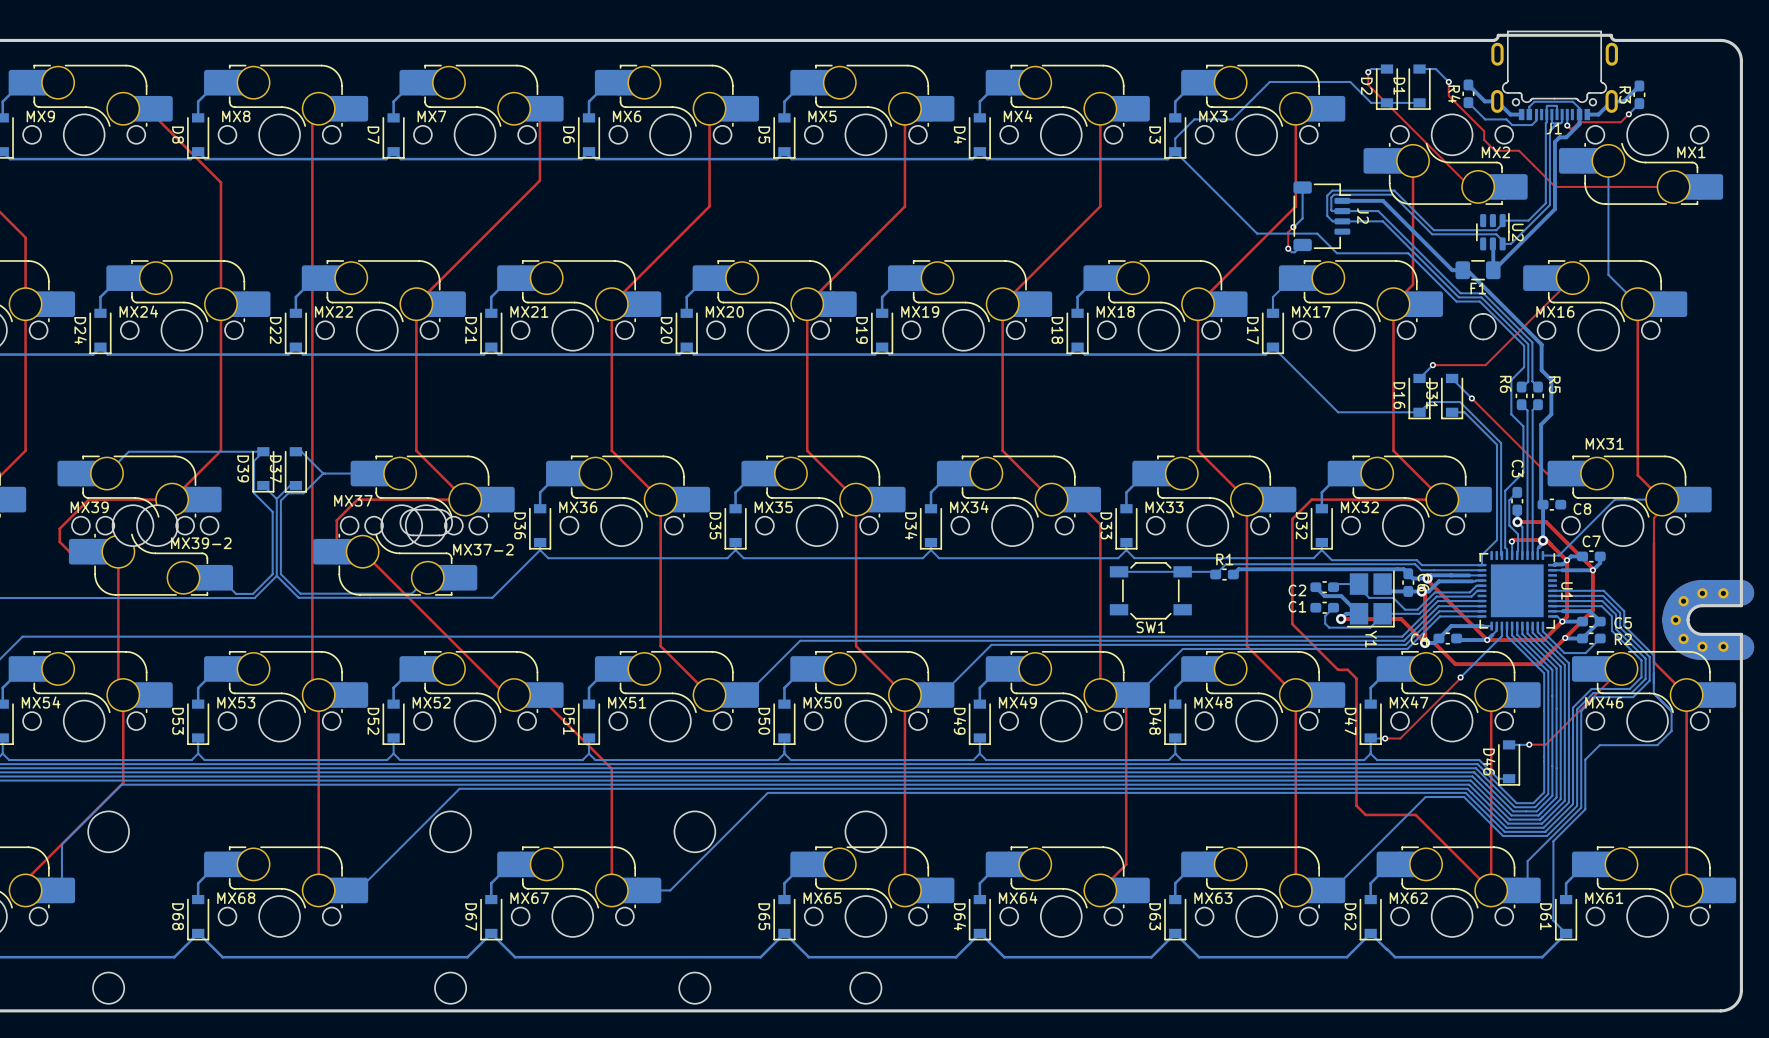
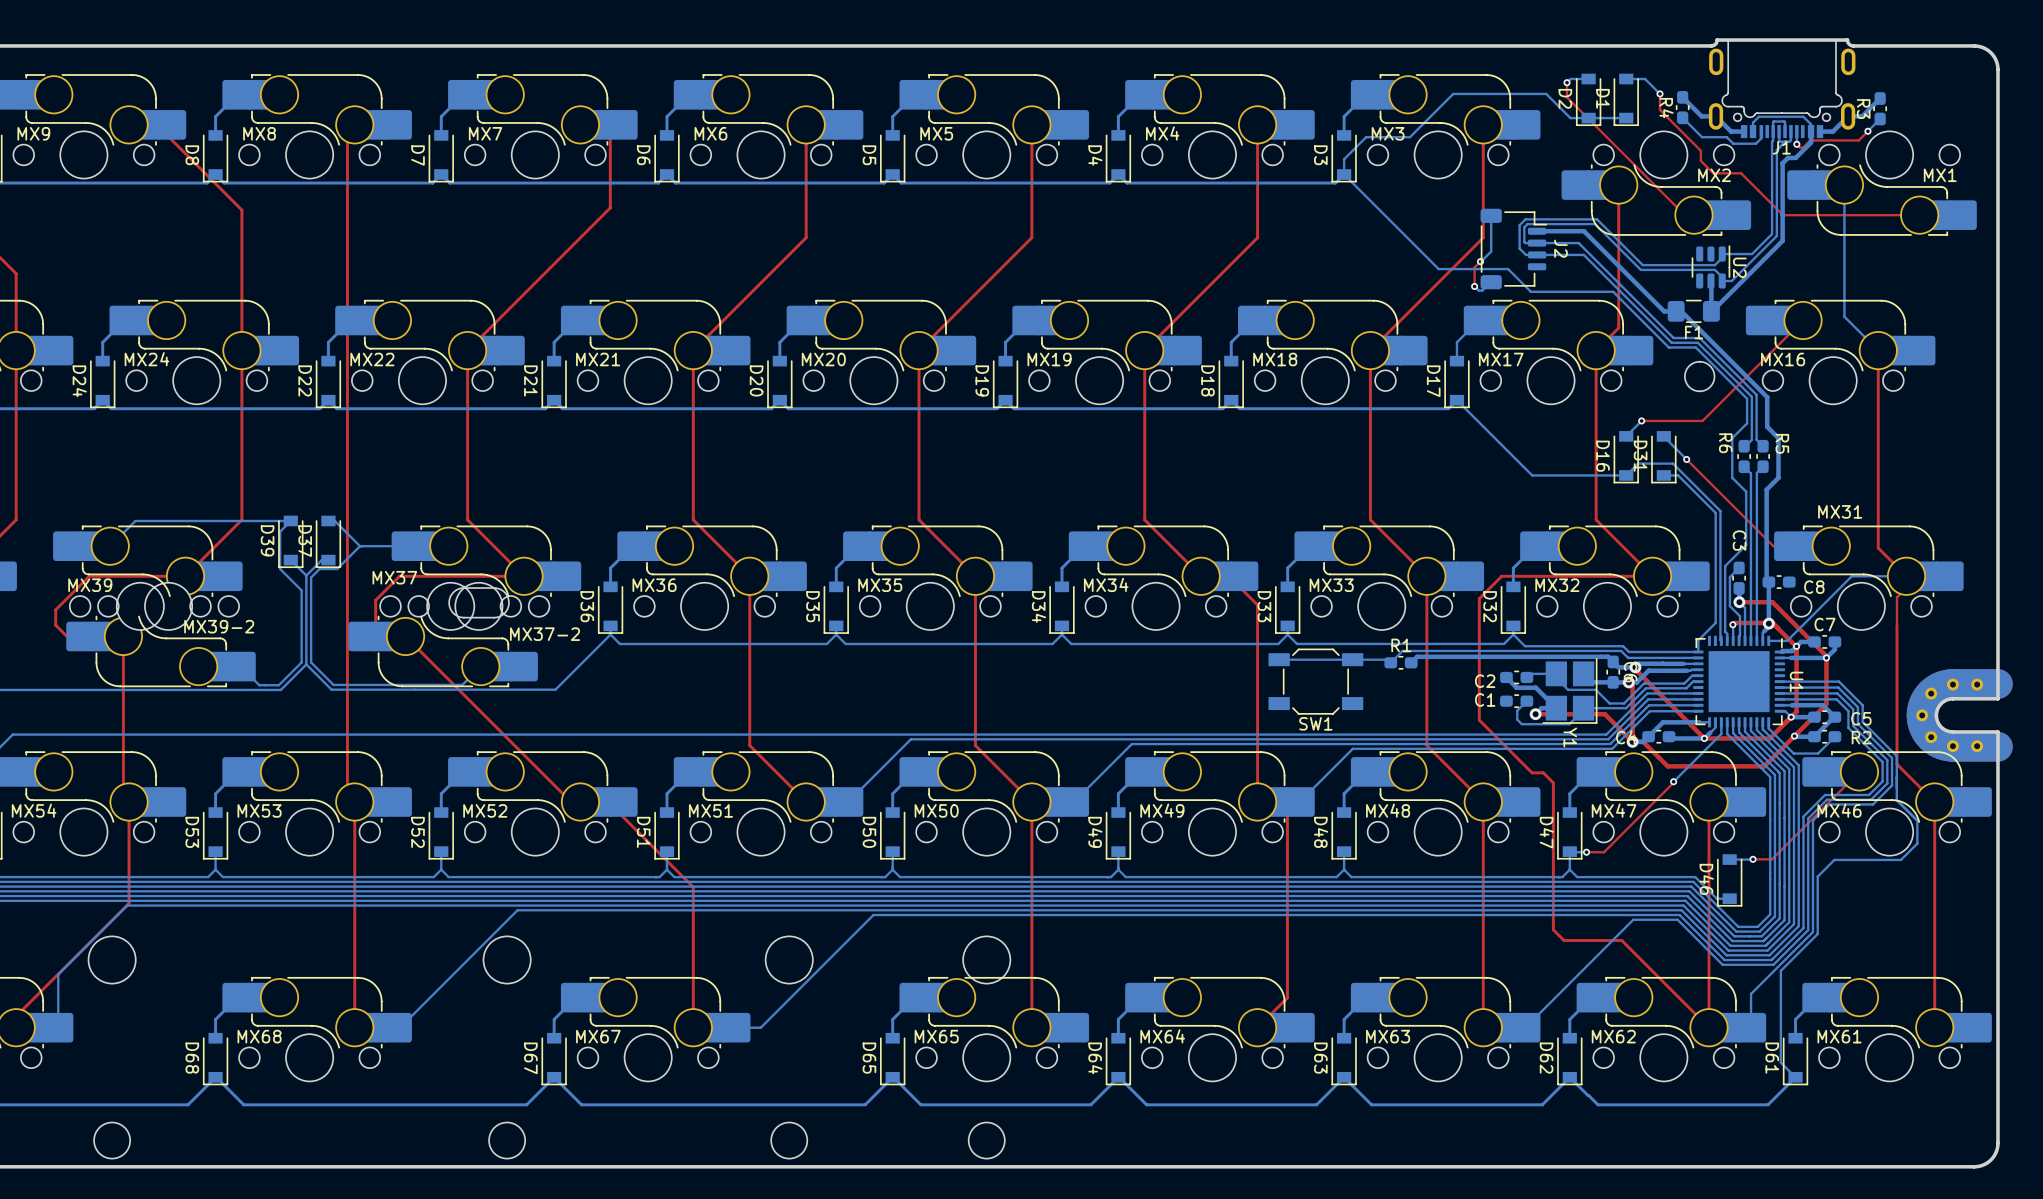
J1 footprint: [1491, 30, 1619, 121] -> [1708, 40, 1856, 139]

